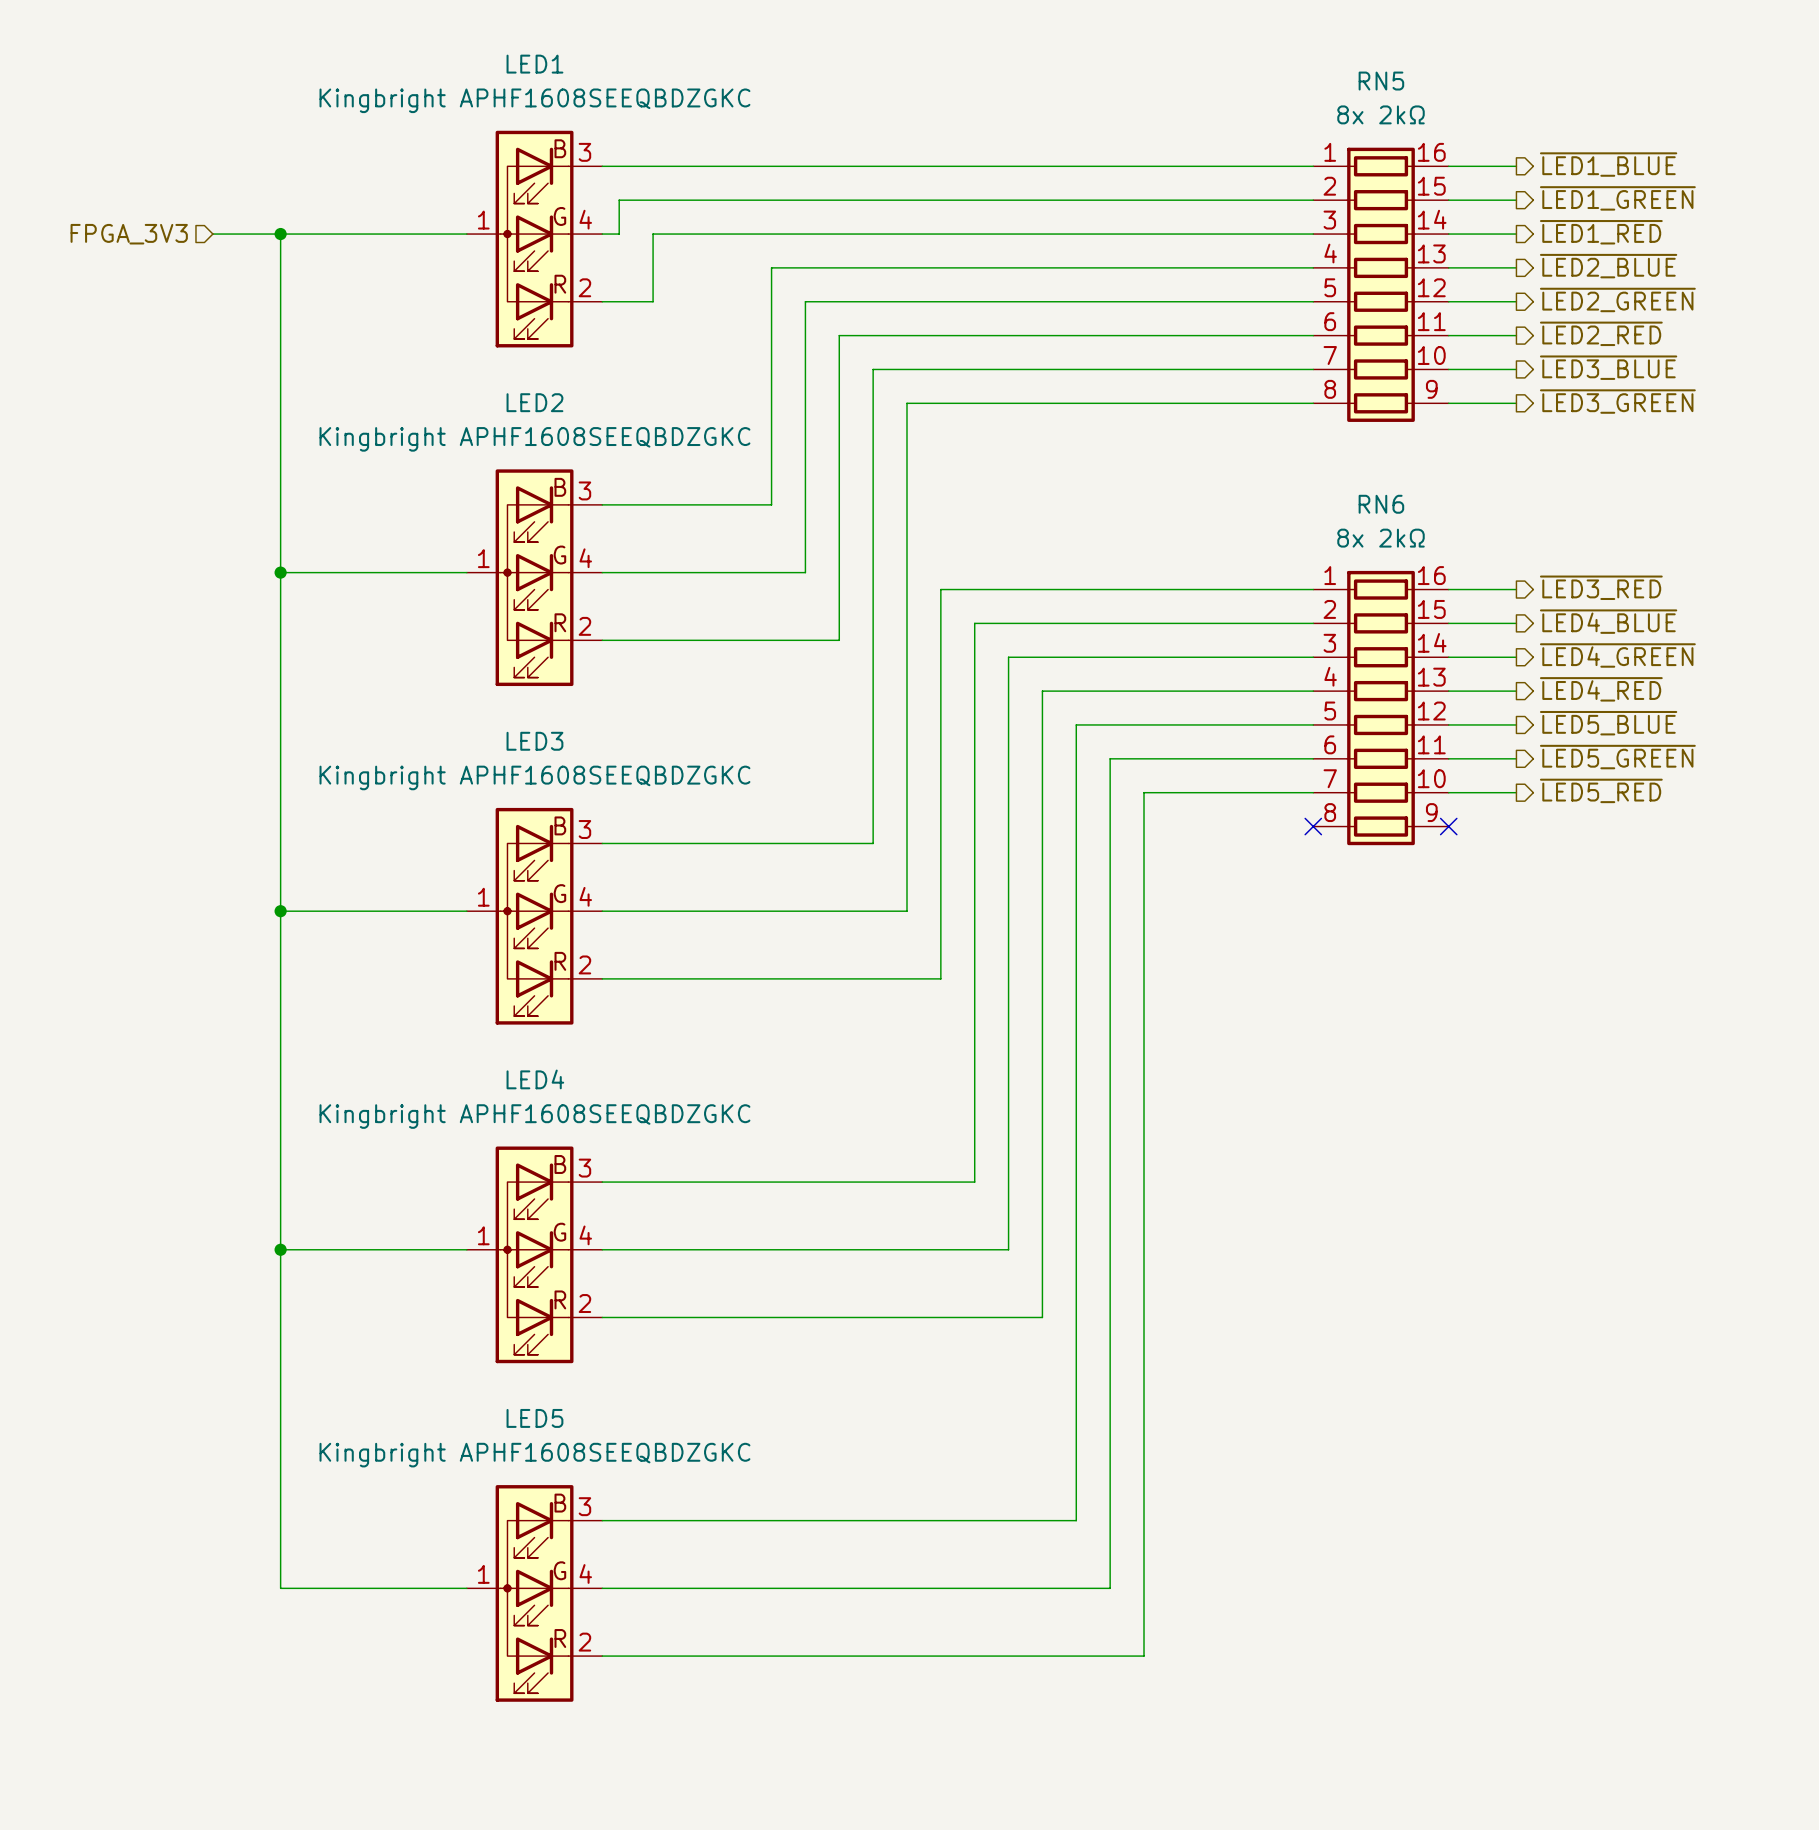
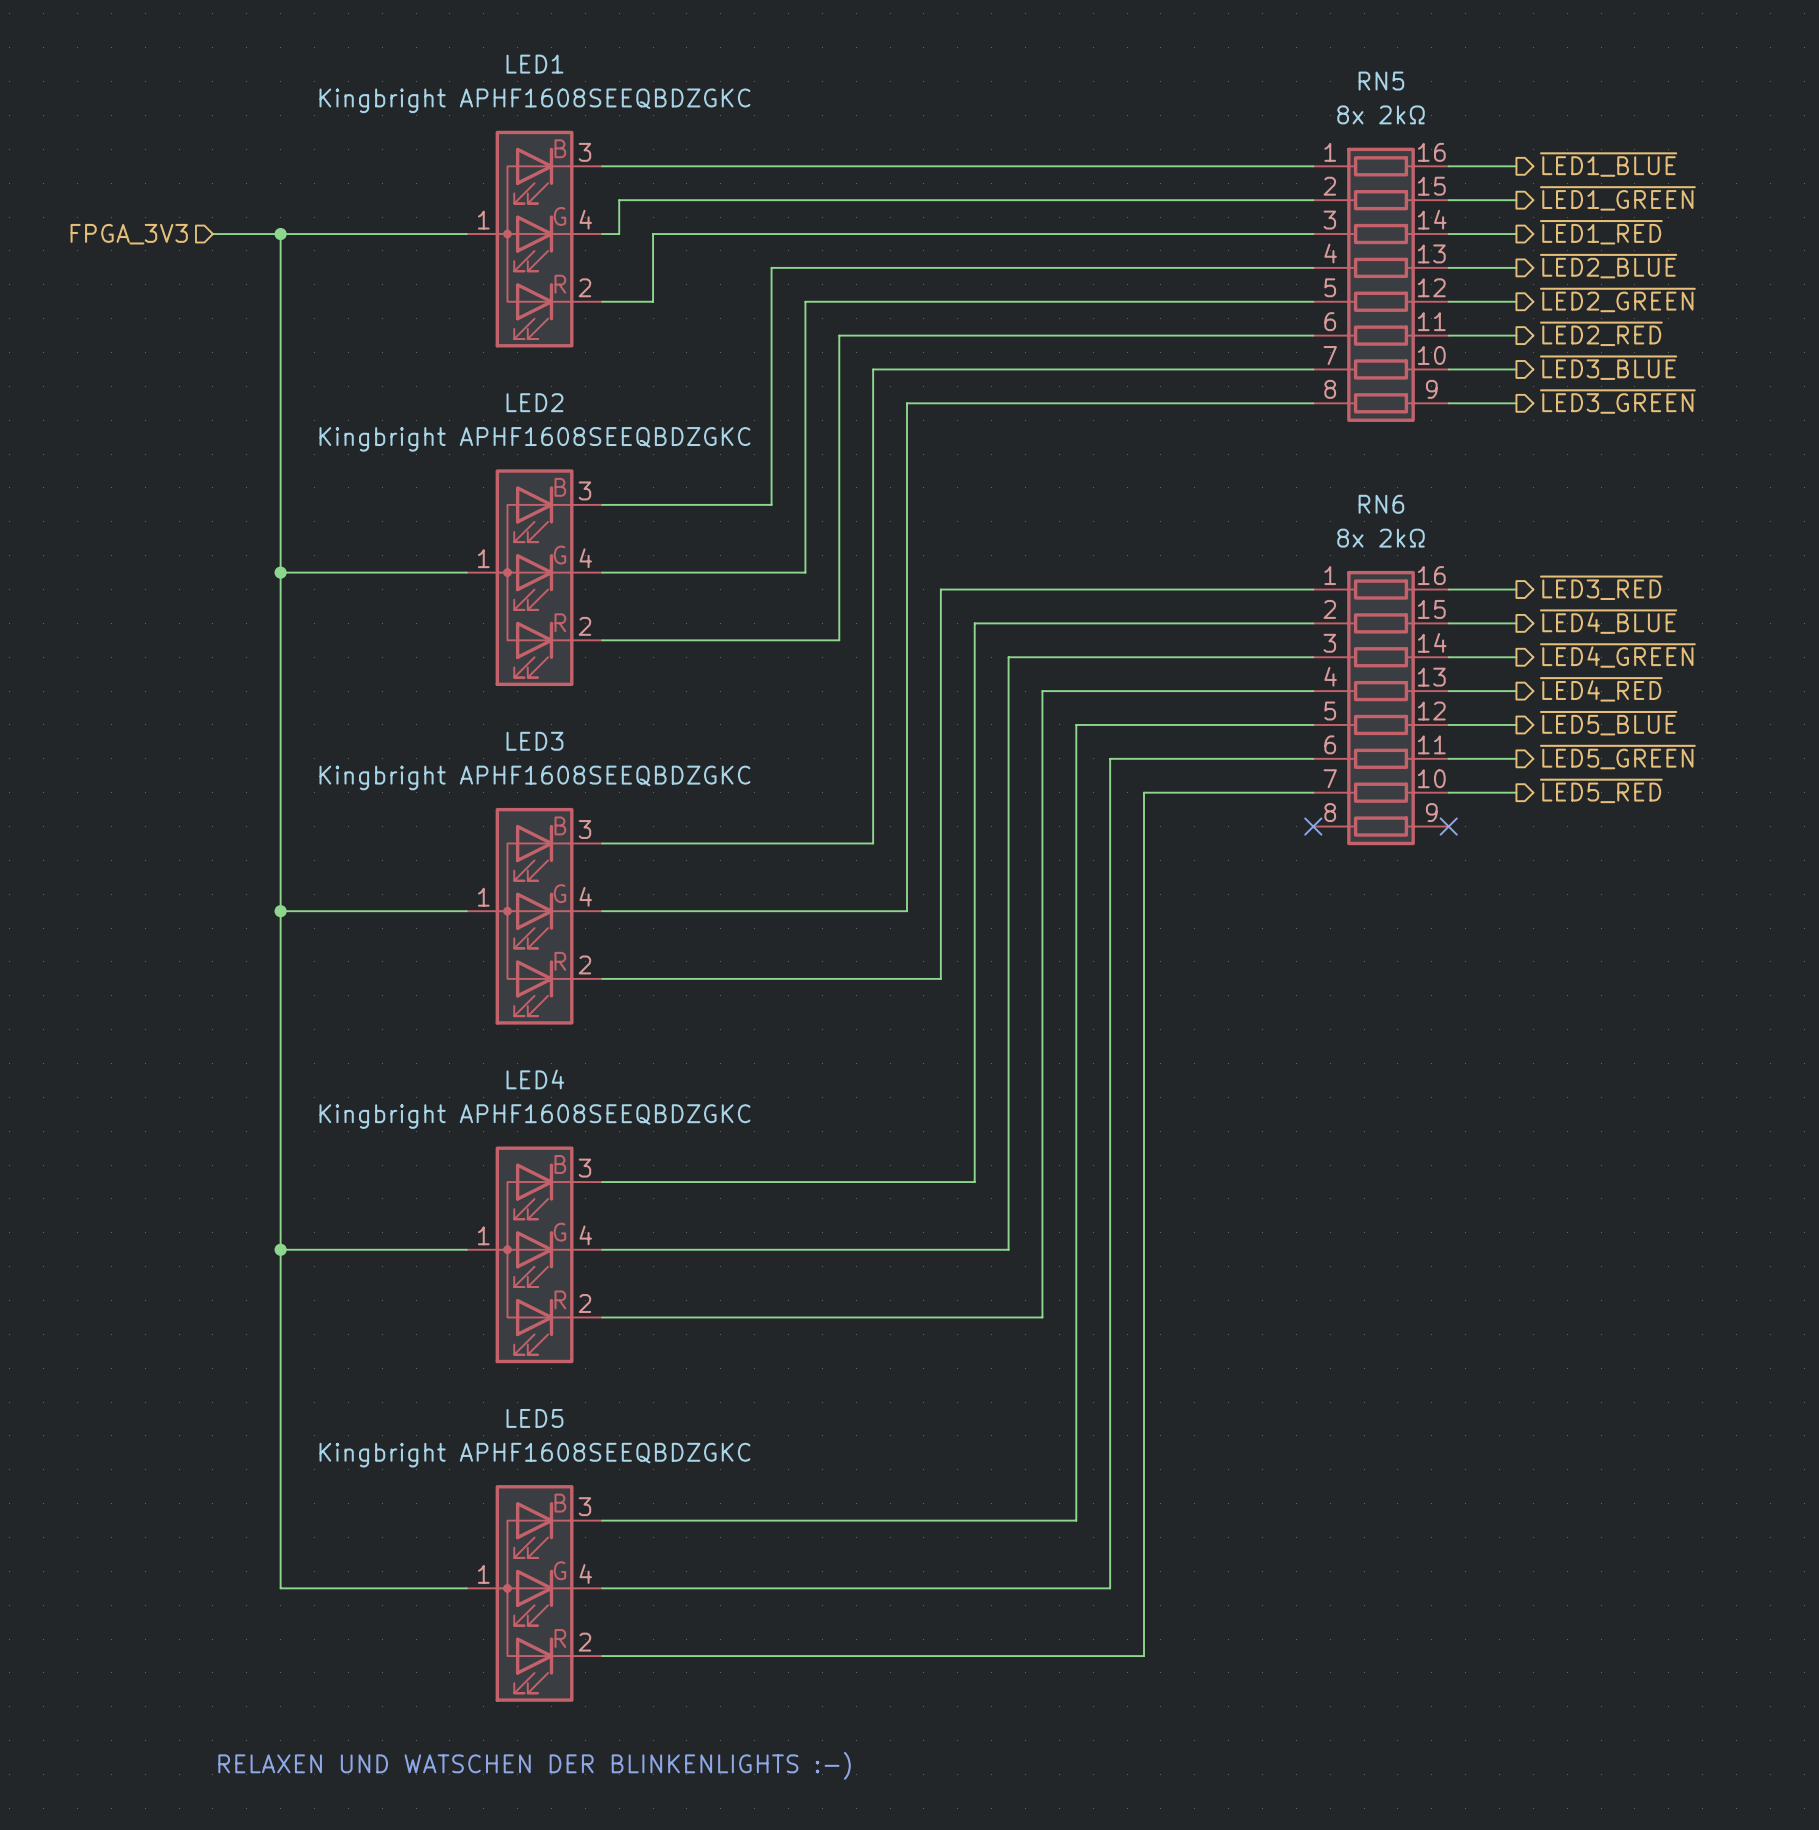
text: none -> RELAXEN UND WATSCHEN DER BLINKENLIGHTS :-) (534, 1765)

